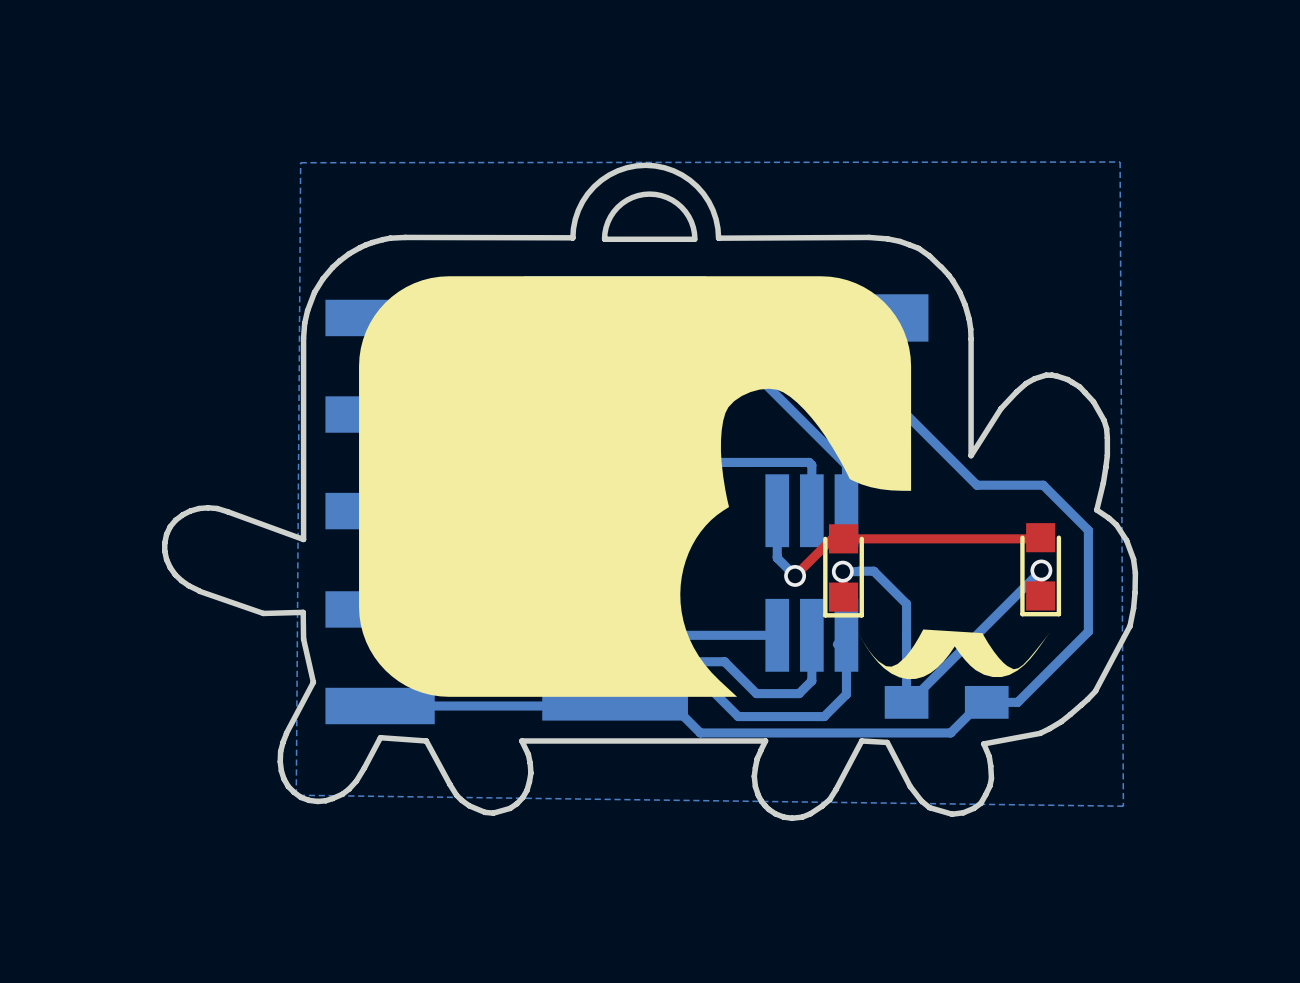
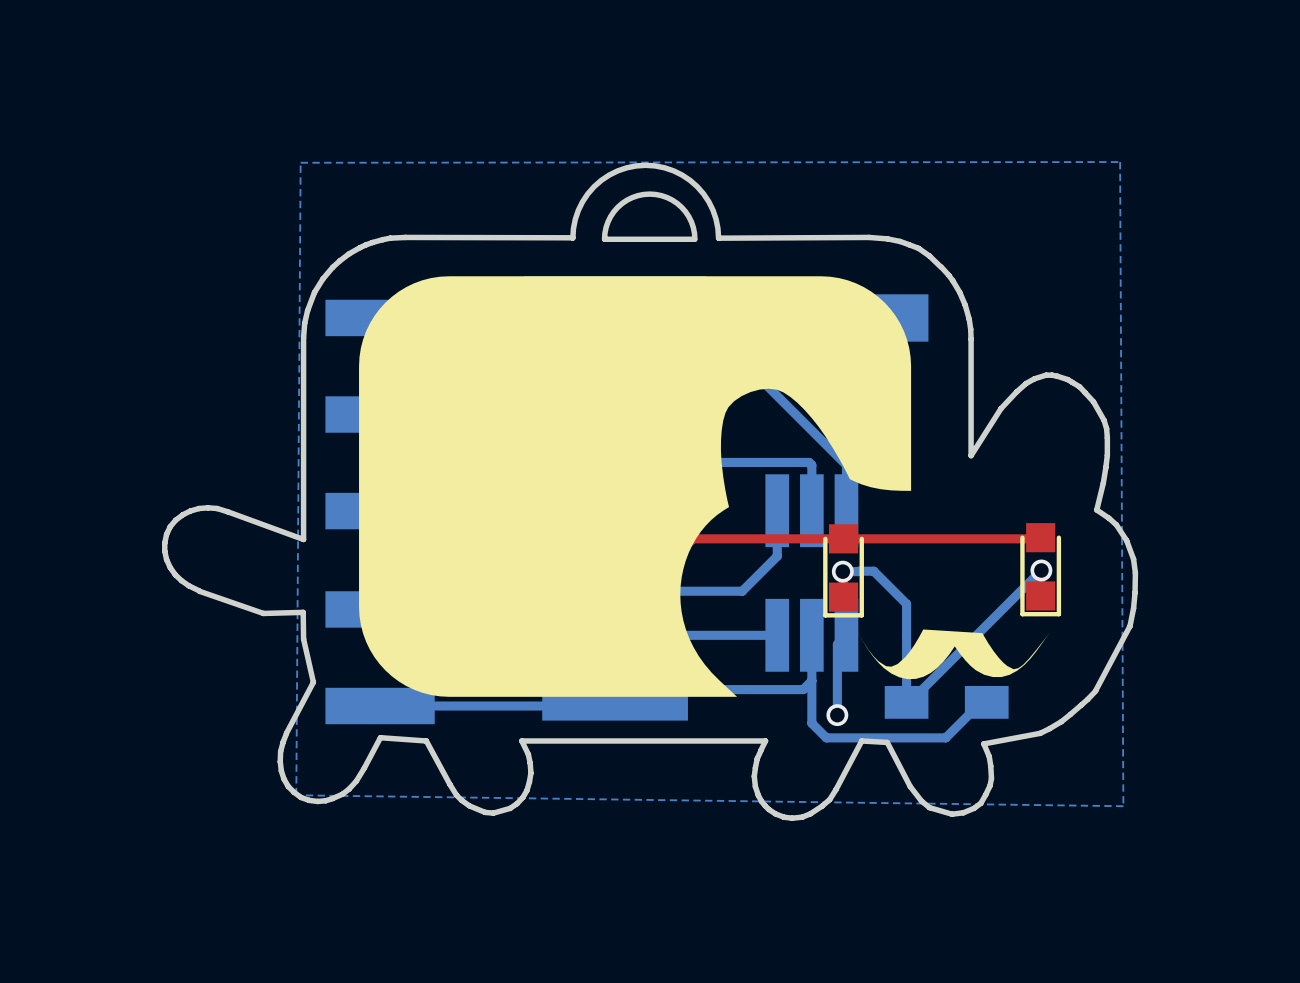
bottom track: (901, 317) (901, 409) (976, 485) (1043, 485) (1088, 530) (1088, 631) (1017, 702) (986, 702) -> none
top track: (832, 538) (795, 575) -> (832, 538) (693, 538) (640, 591)
bottom track: (777, 556) (795, 575) -> (777, 556) (742, 591) (640, 591)
via: (795, 575) -> none
bottom track: (846, 635) (846, 694) (824, 716) (738, 716) (706, 684) -> none
bottom track: none -> (837, 644) (837, 715)
bottom track: (657, 689) (700, 732) (950, 732) -> (811, 680) (811, 723) (826, 737) (945, 737) (950, 732)
bottom track: (667, 689) (695, 661) (724, 661) (756, 693) (799, 693) (803, 689) -> (667, 689) (803, 689)
via: none -> (837, 715)

